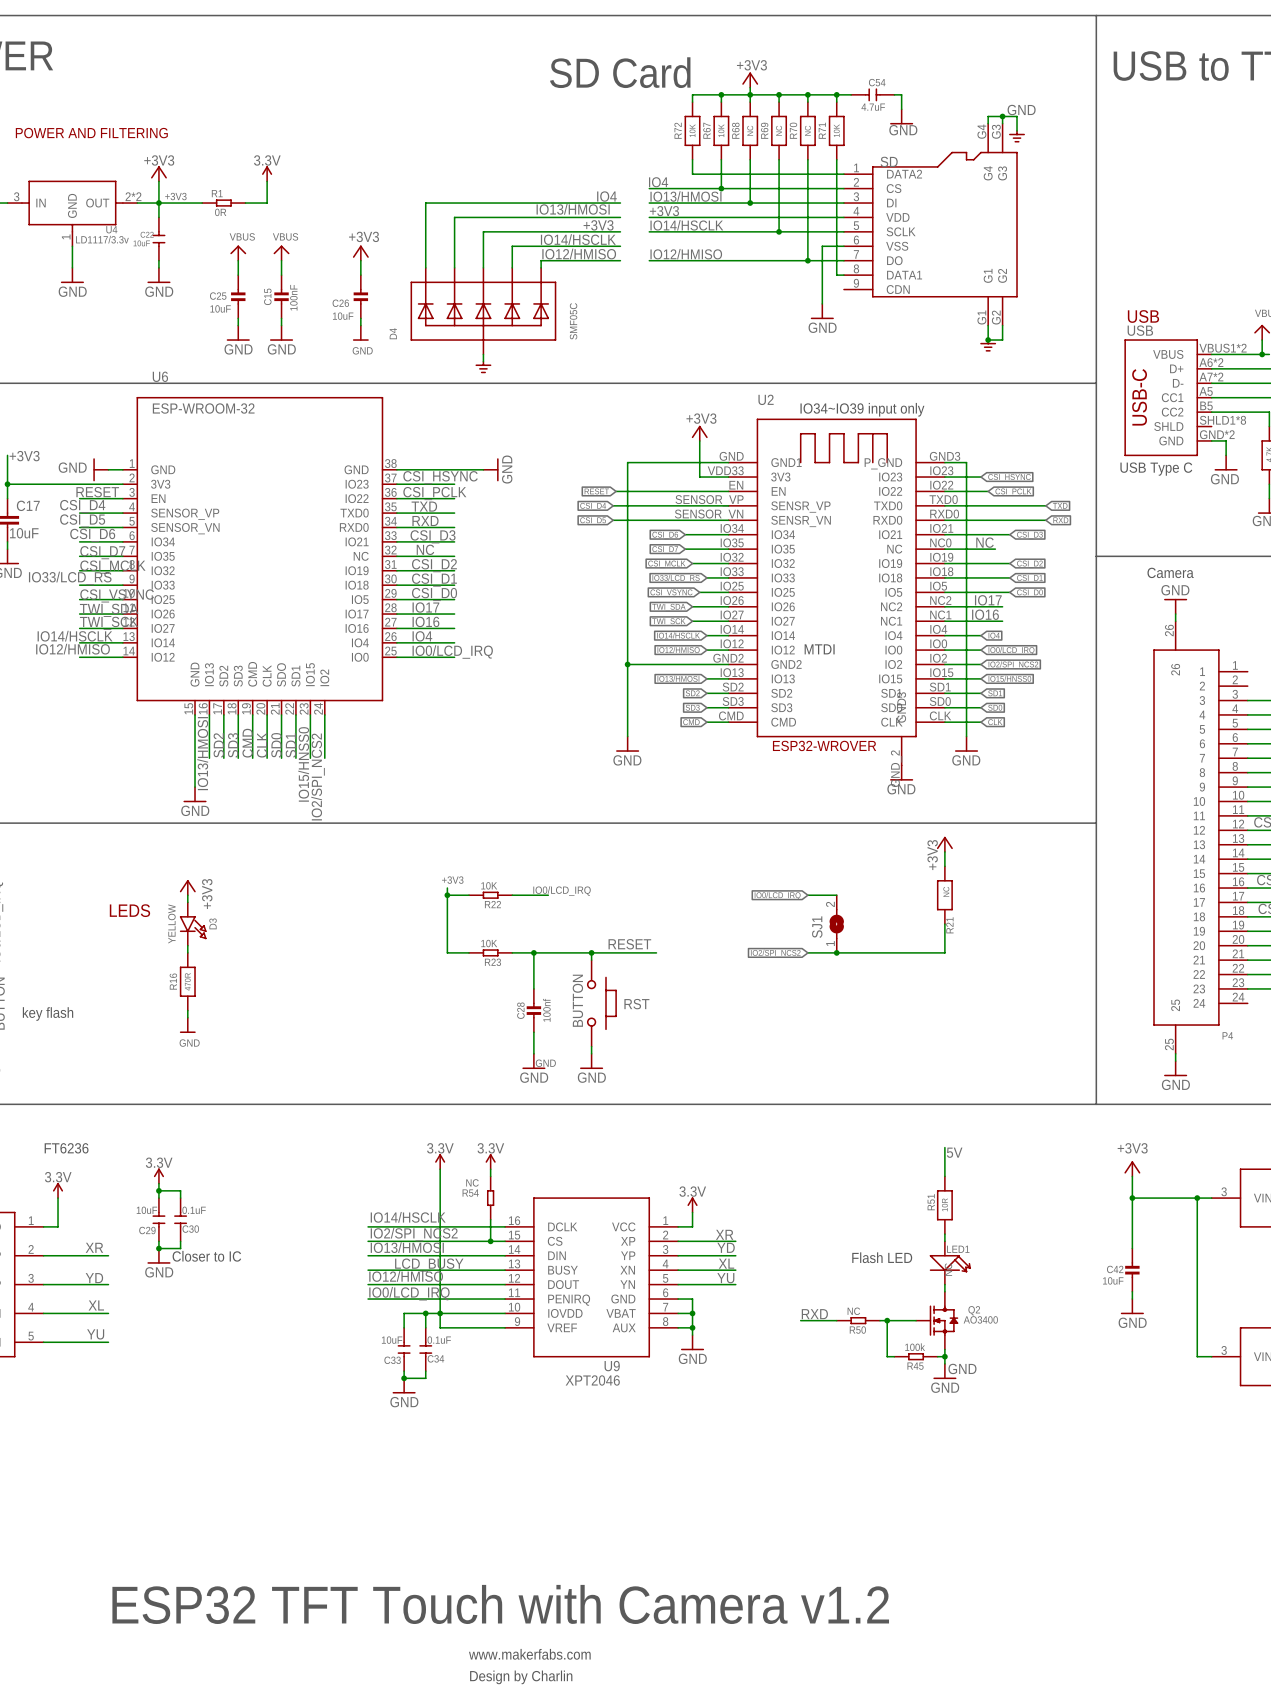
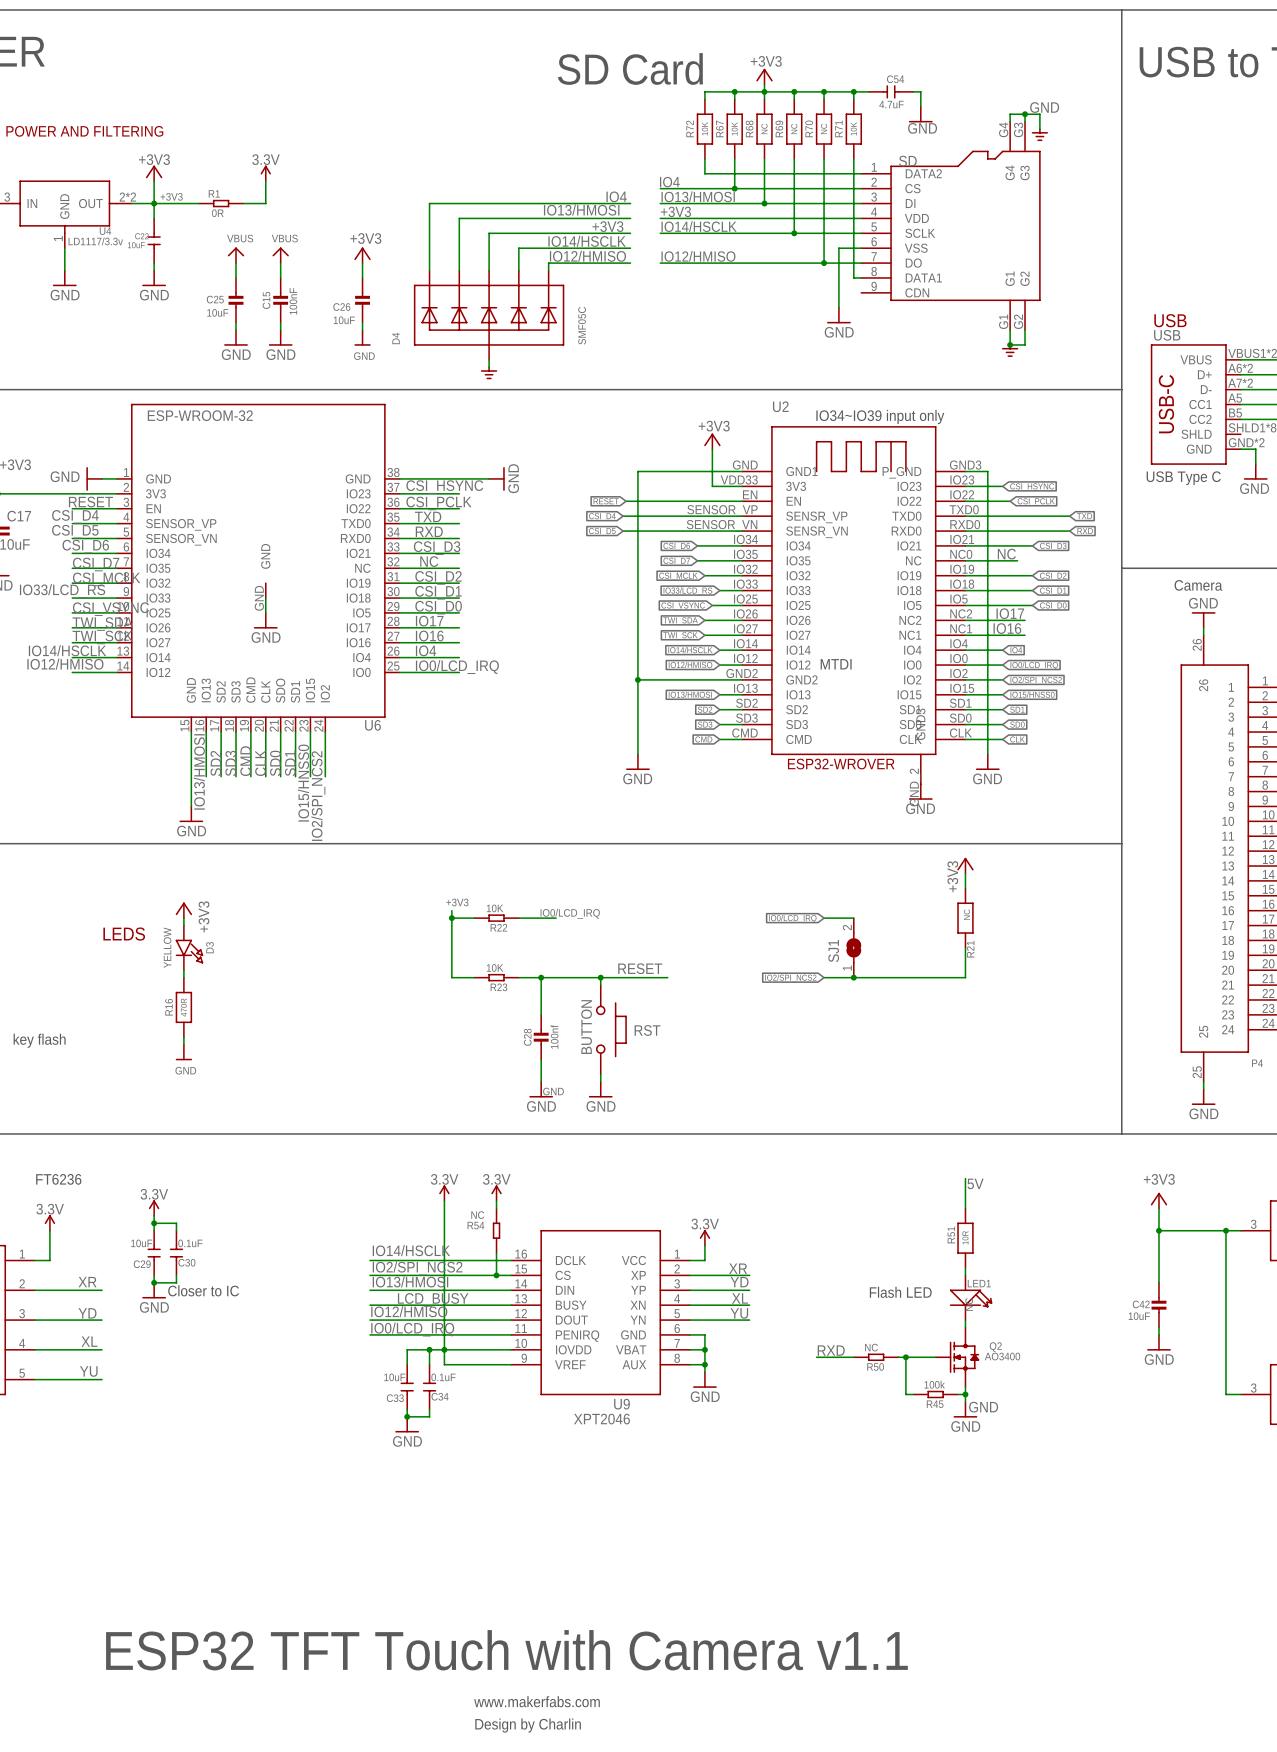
U6 name position: U6 (160, 376) -> U6 (372, 725)
U6 symbol: [122, 396, 397, 715] -> [116, 403, 400, 733]
wire: none -> (265, 598) (265, 612)
power symbol: none -> GND (265, 620)
text: ESP32 TFT Touch with Camera v1.2 (500, 1604) -> ESP32 TFT Touch with Camera v1.1 (506, 1650)

